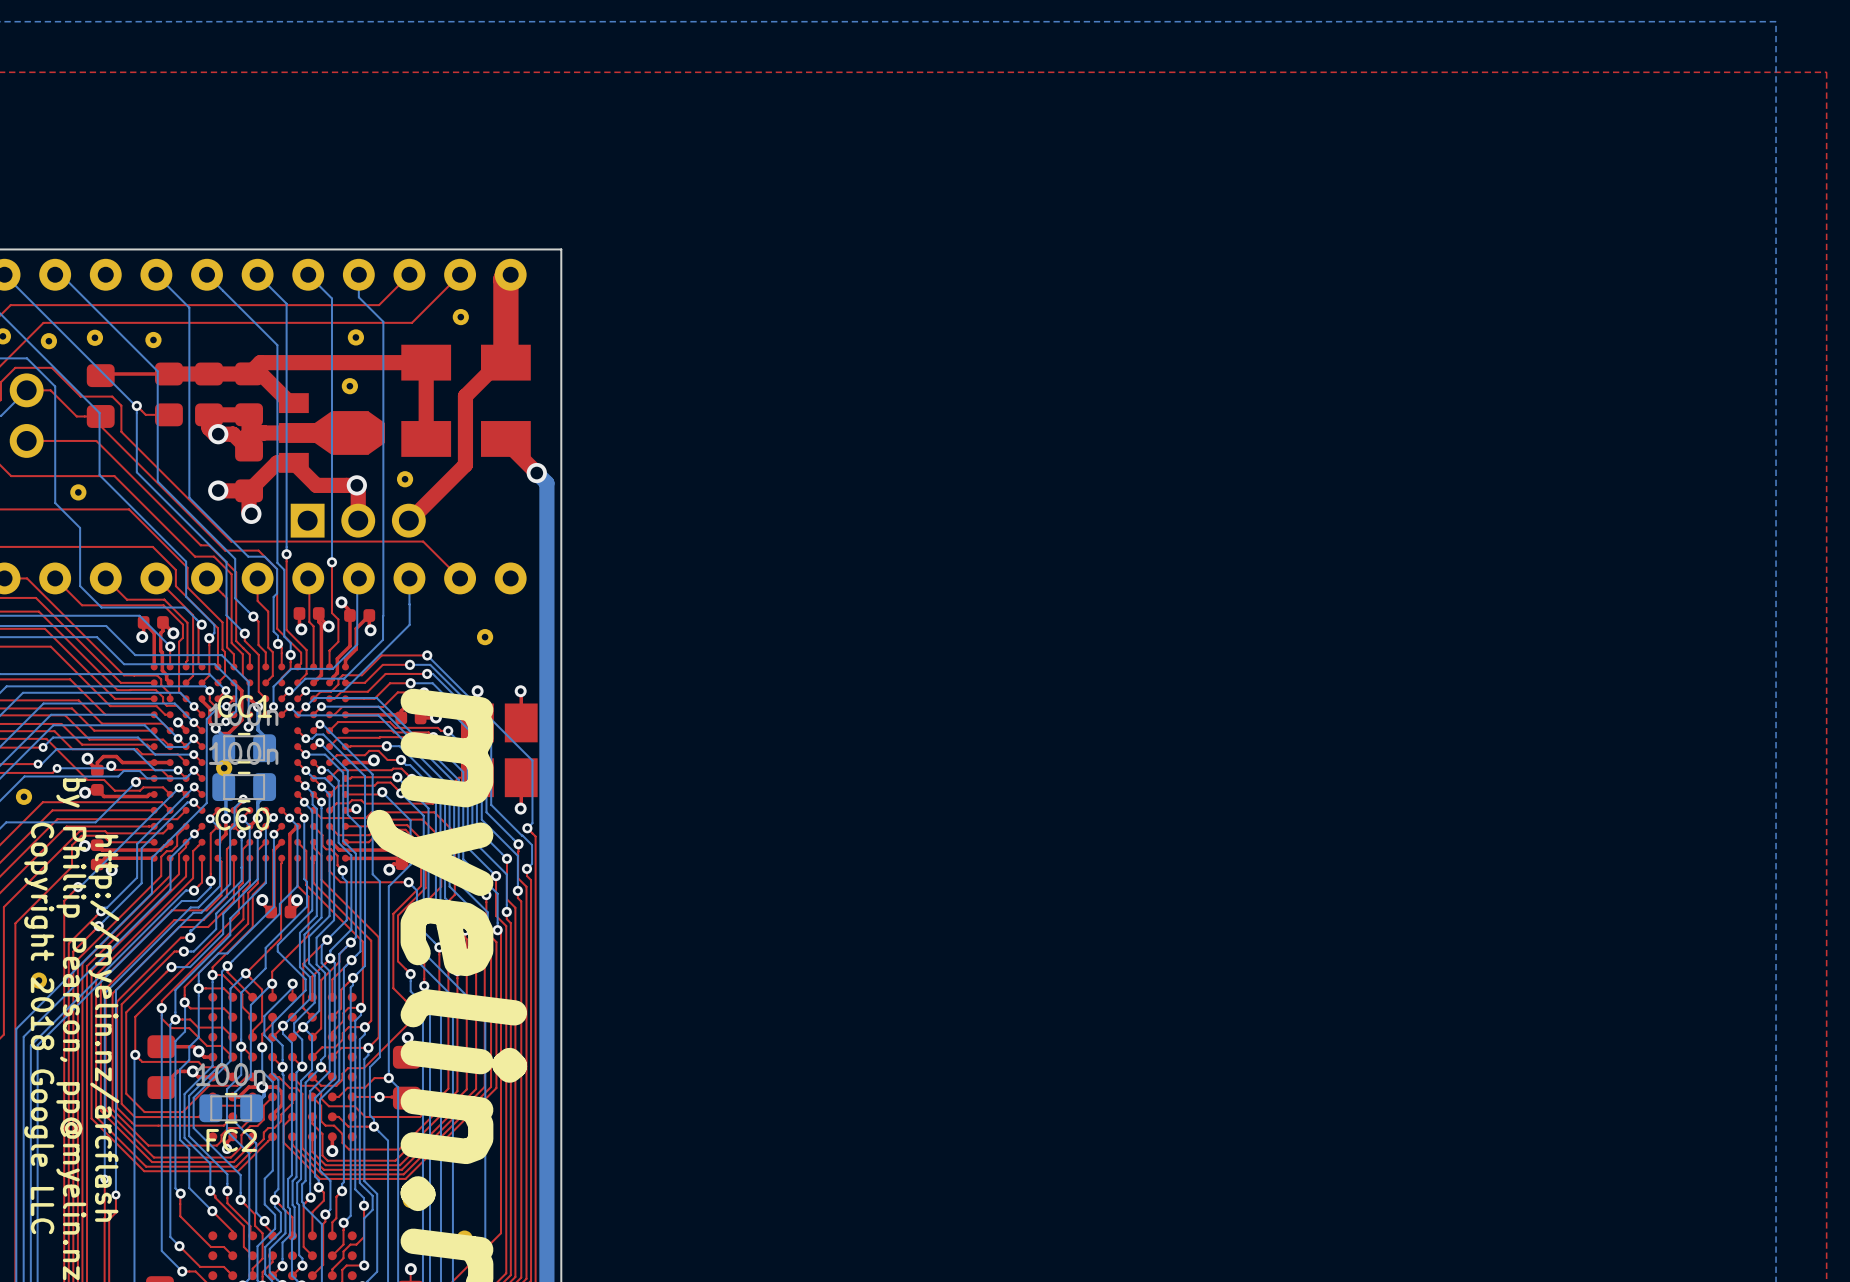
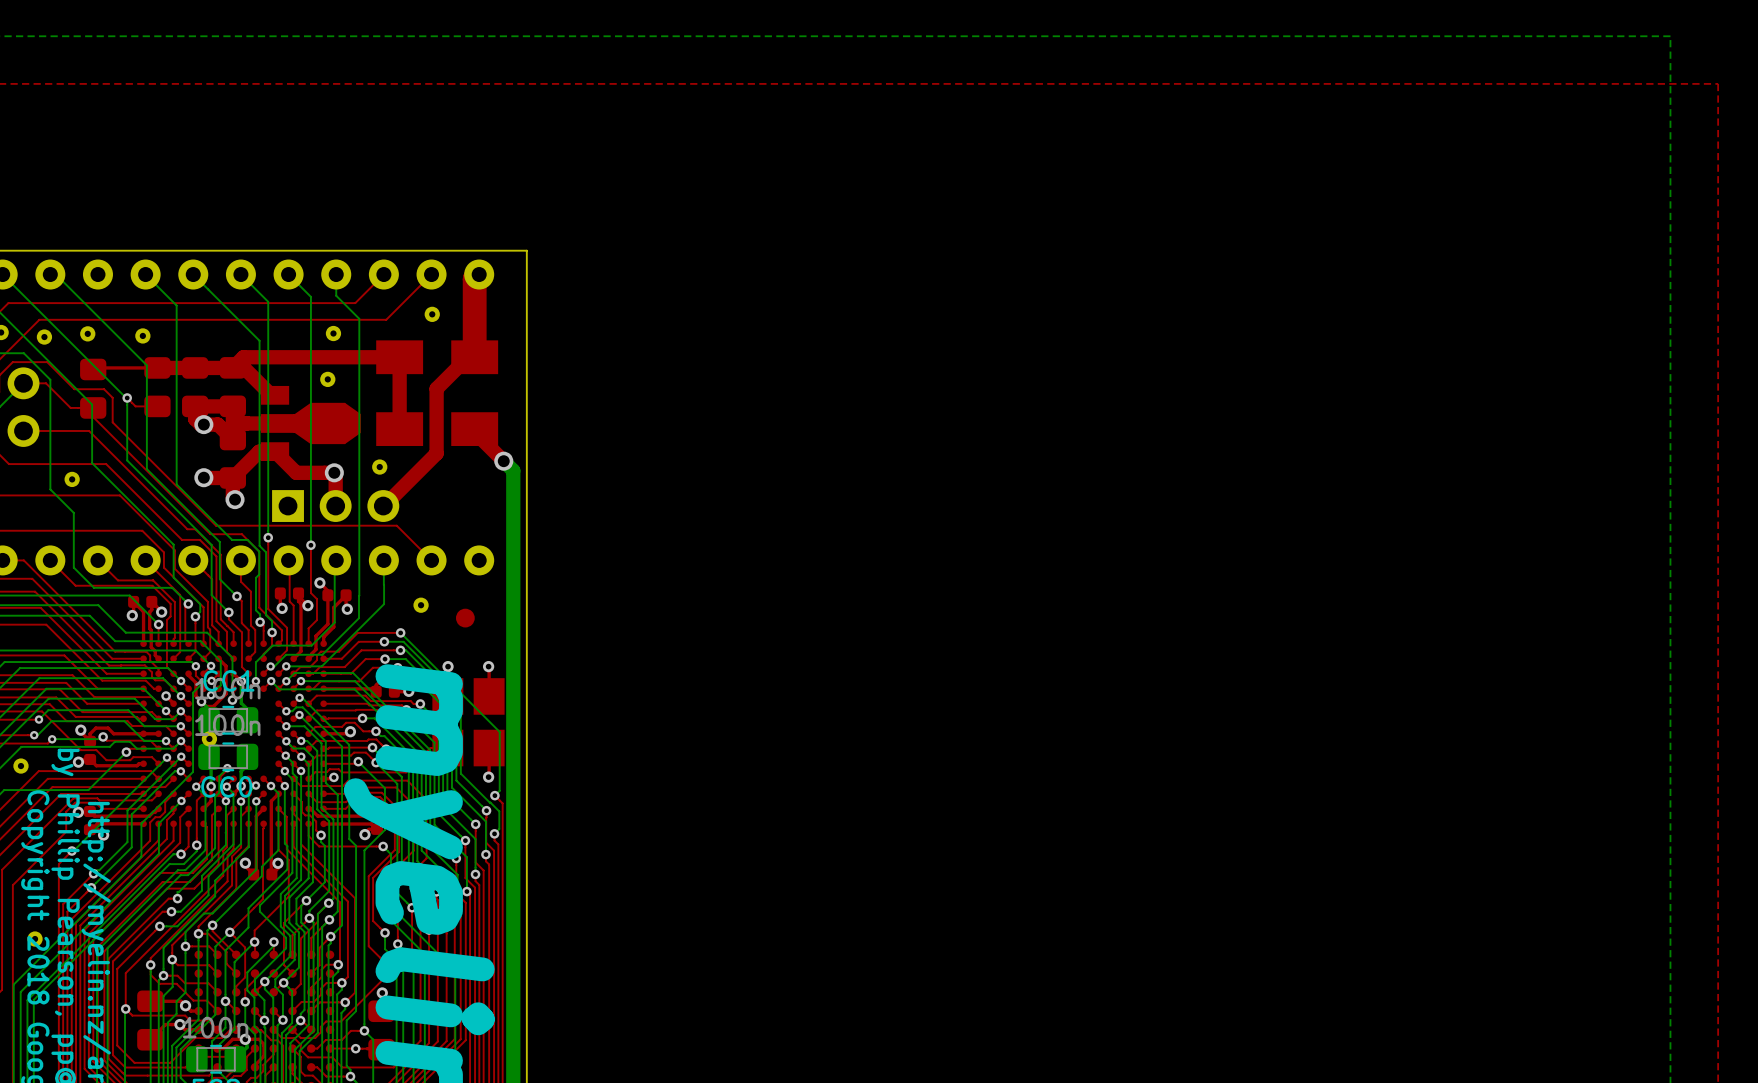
part: none -> (421, 605)
part footprint: [476, 629, 494, 646] -> [455, 608, 475, 628]

